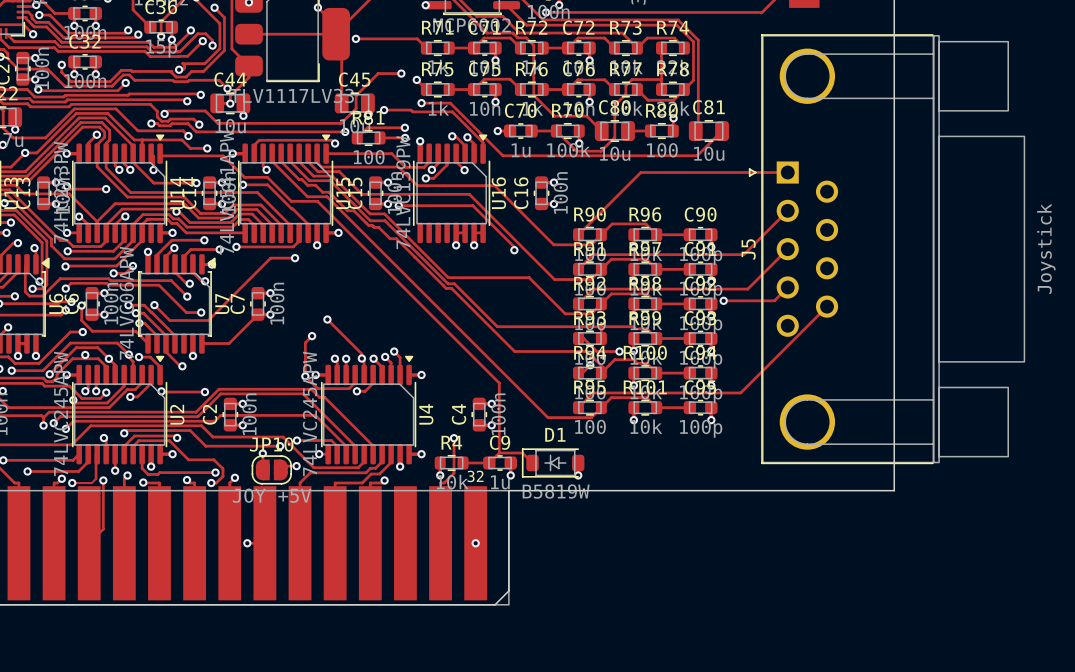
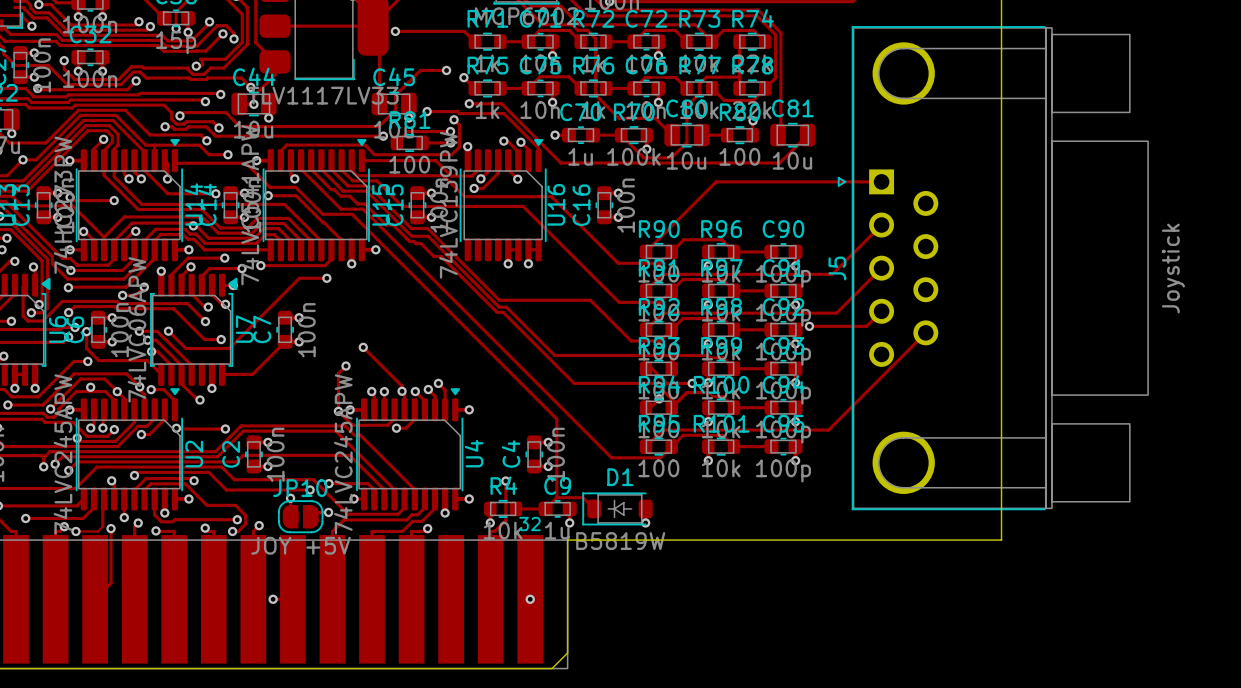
via: none -> (454, 119)
track: (335, 143) (331, 140) (259, 140) (254, 145) -> (454, 119) (459, 125) (459, 147) (451, 154) (374, 154) (364, 145) (286, 145) (280, 151)
via: (335, 143) -> none
track: (398, 205) (472, 205) (514, 247) (514, 250) -> none
via: (398, 205) -> none
via: (514, 250) -> none

